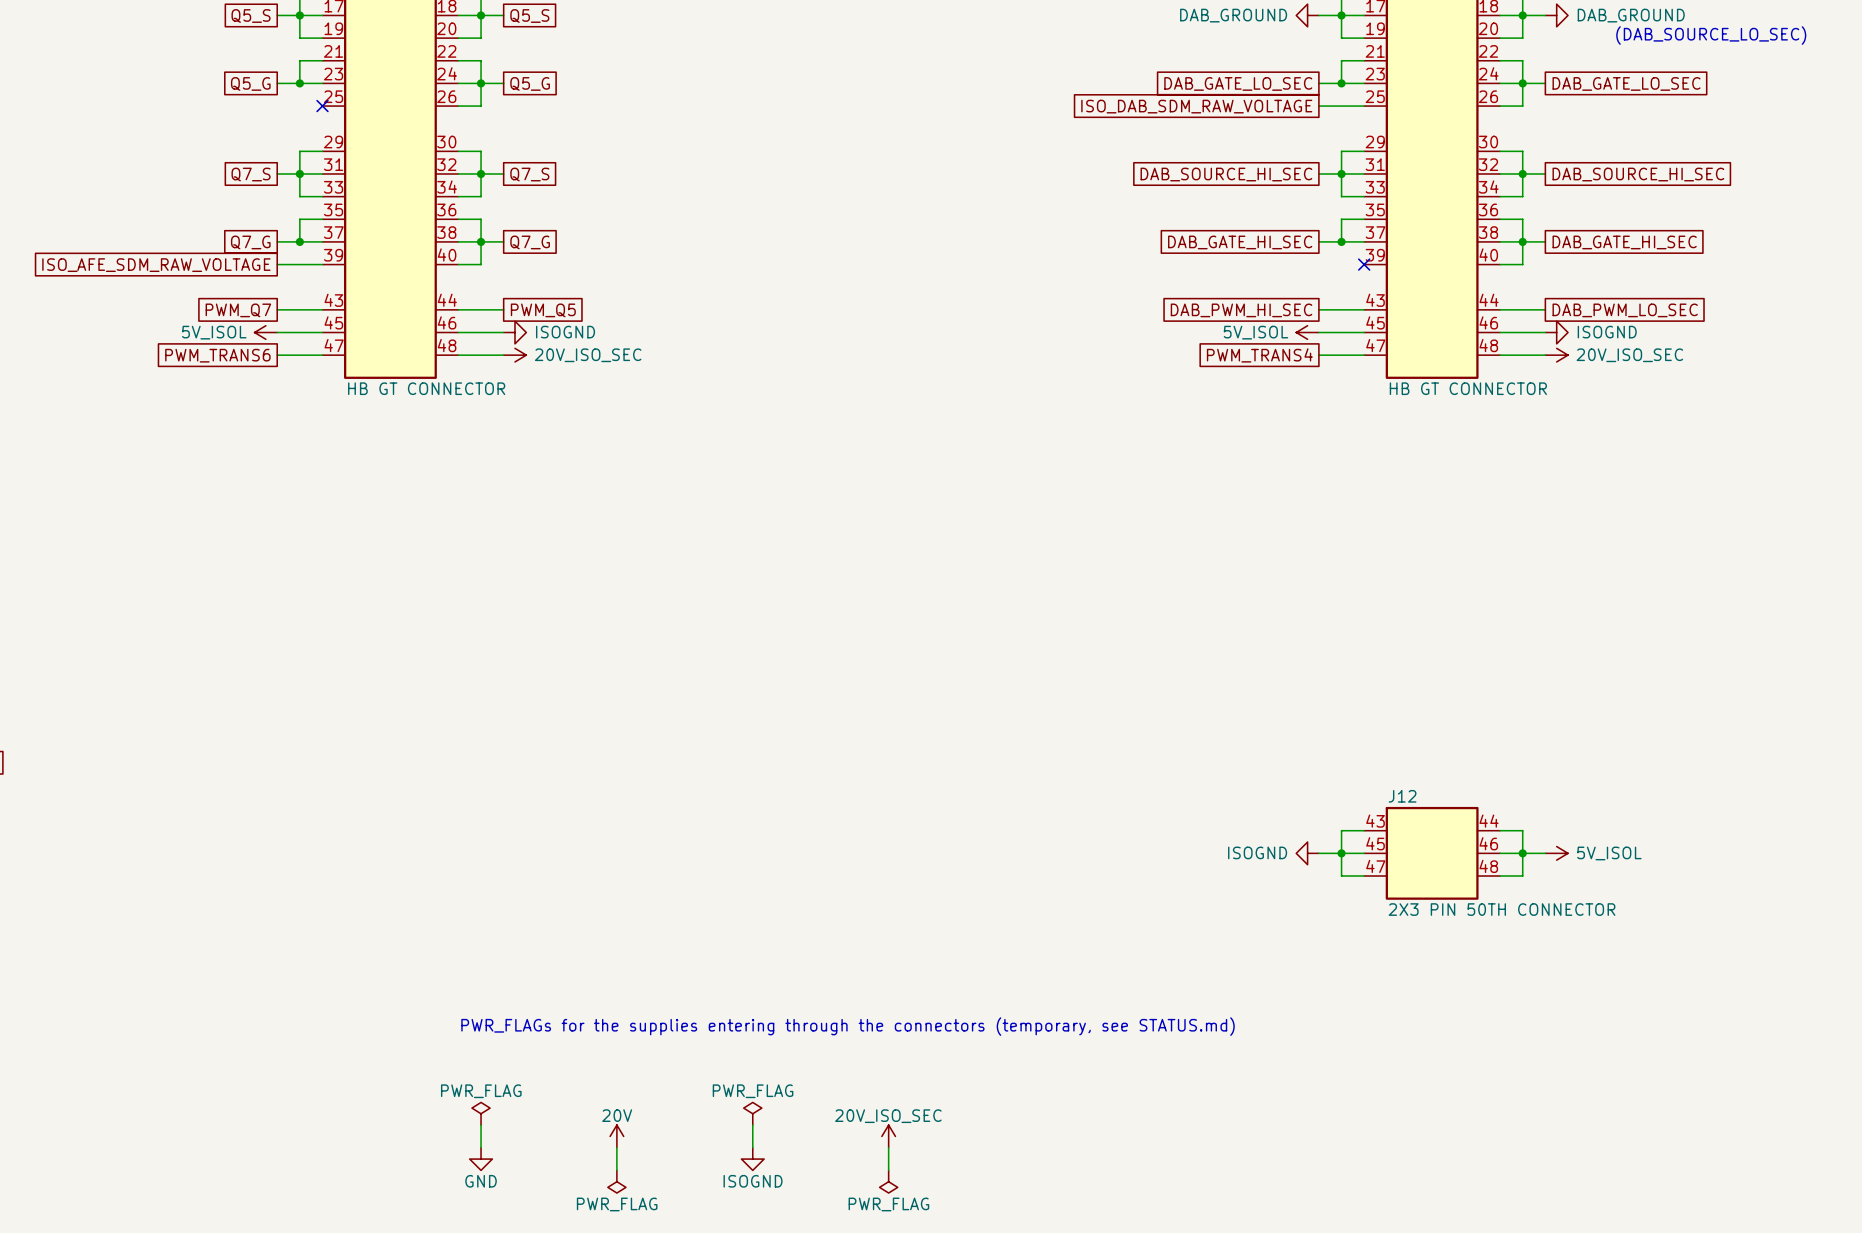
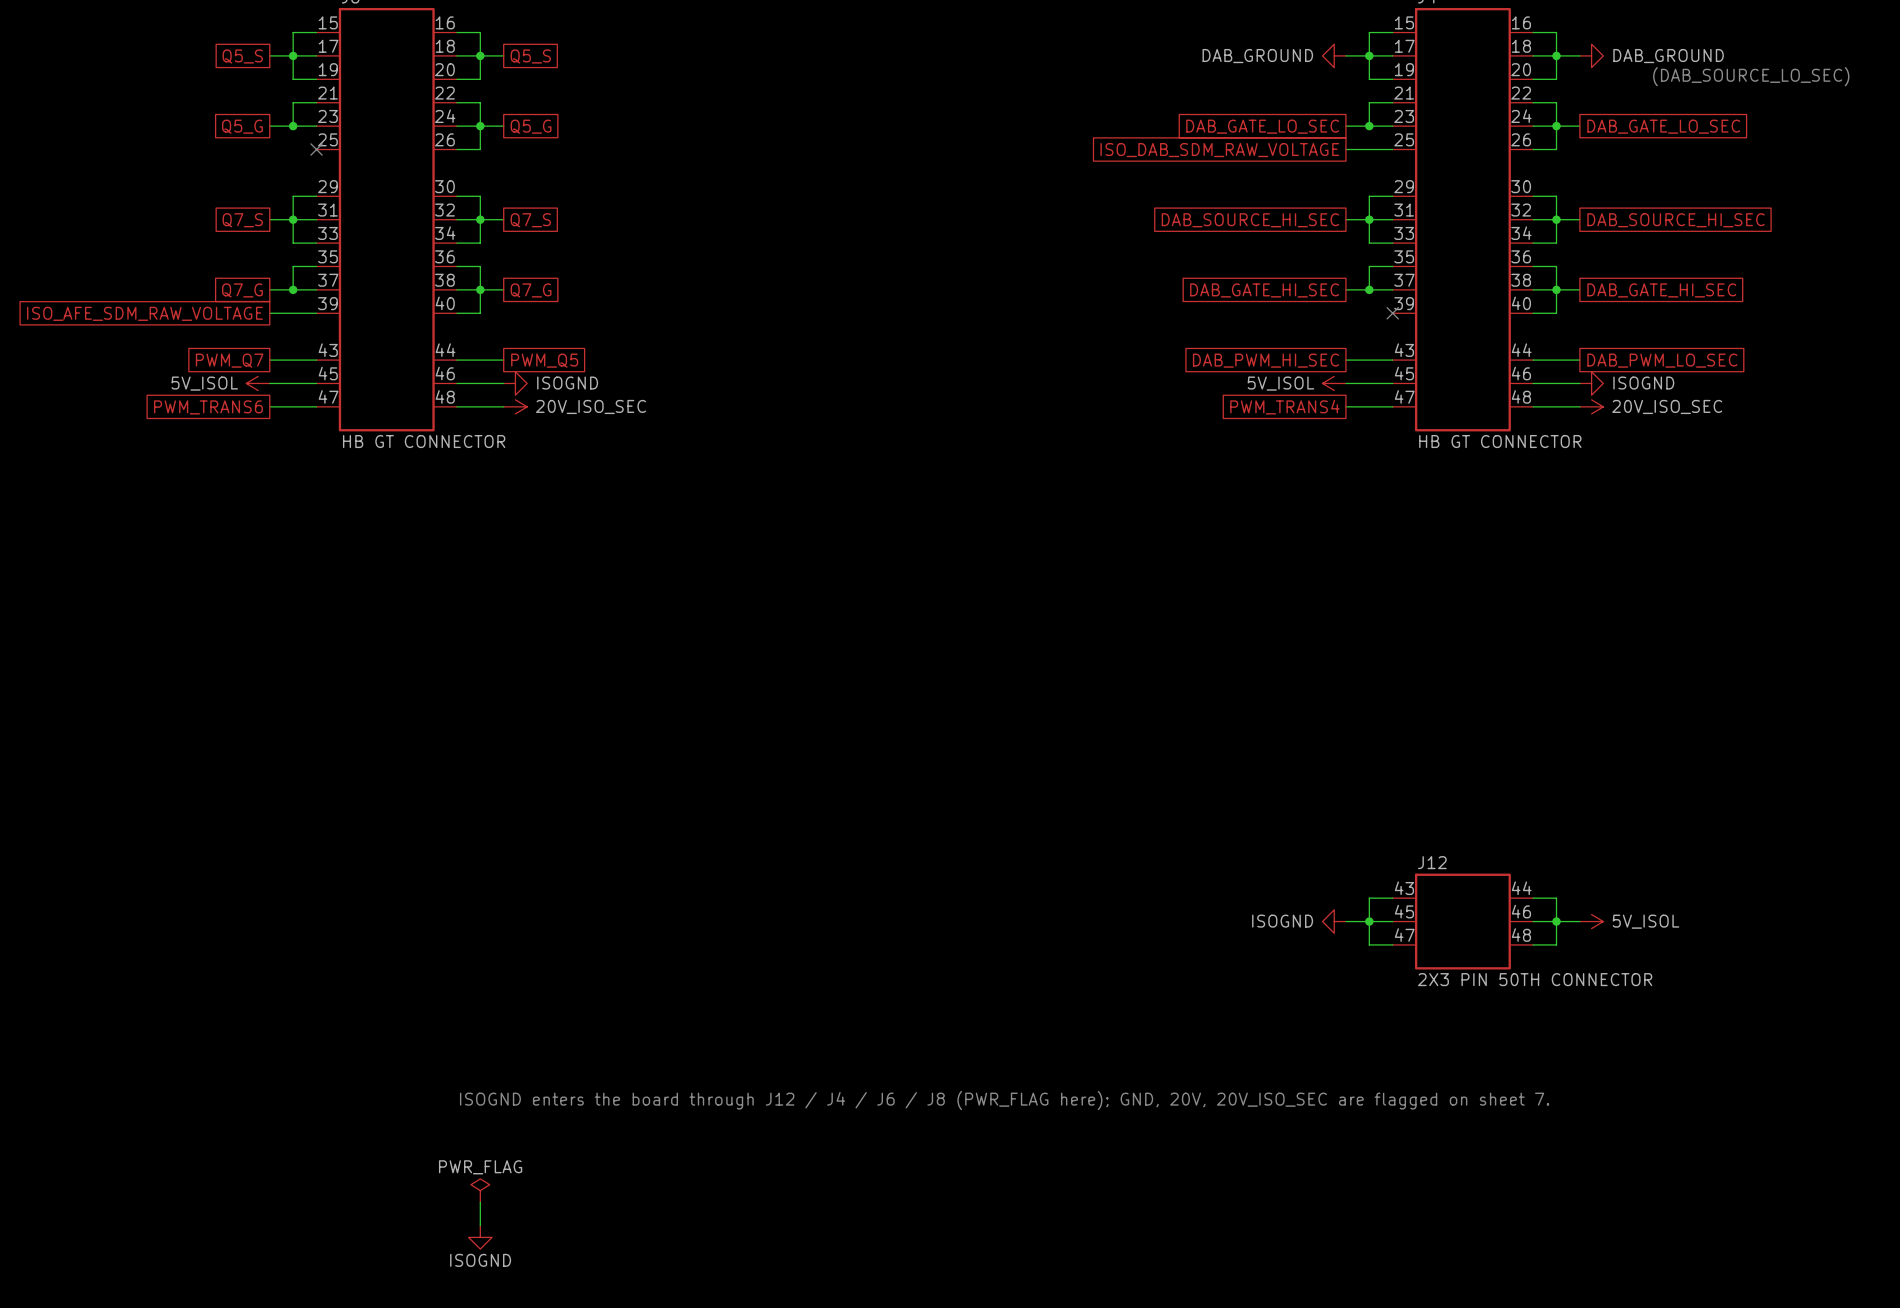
text: PWR_FLAGs for the supplies entering through the connectors (temporary, see STATUS.md) (848, 1026) -> ISOGND enters the board through J12 / J4 / J6 / J8 (PWR_FLAG here); GND, 20V, 20V_ISO_SEC are flagged on sheet 7. (1004, 1100)
power symbol: PWR_FLAG (752, 1113) -> none
wire: (752, 1125) (752, 1147) -> none
power symbol: 20V (616, 1136) -> none
power symbol: 20V_ISO_SEC (888, 1136) -> none
wire: (616, 1147) (616, 1170) -> none
wire: (888, 1147) (888, 1170) -> none
power symbol: GND (481, 1159) -> ISOGND (480, 1237)
power symbol: ISOGND (752, 1159) -> none
power symbol: PWR_FLAG (616, 1181) -> none
power symbol: PWR_FLAG (888, 1181) -> none

